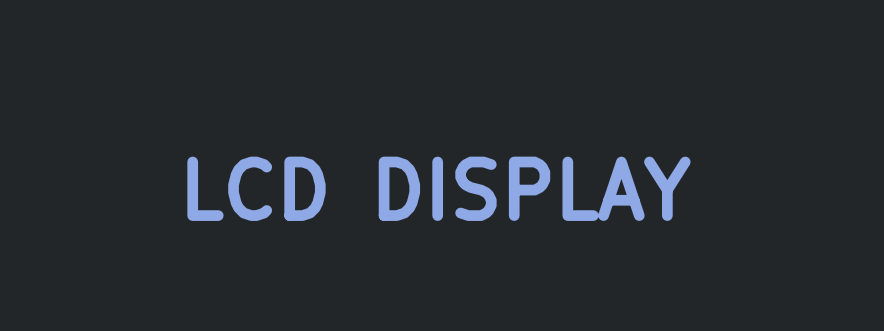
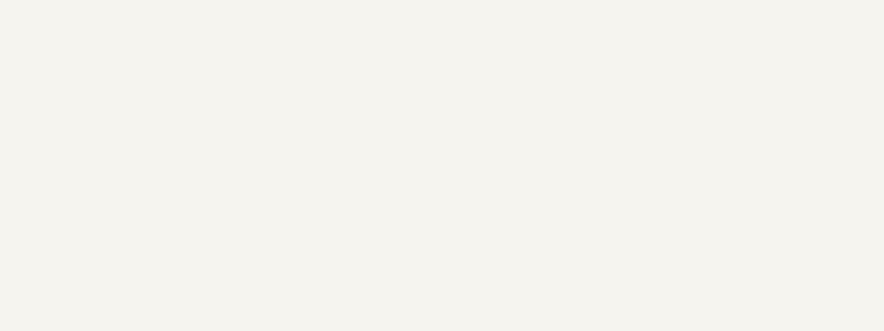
text: LCD DISPLAY (438, 188) -> none

